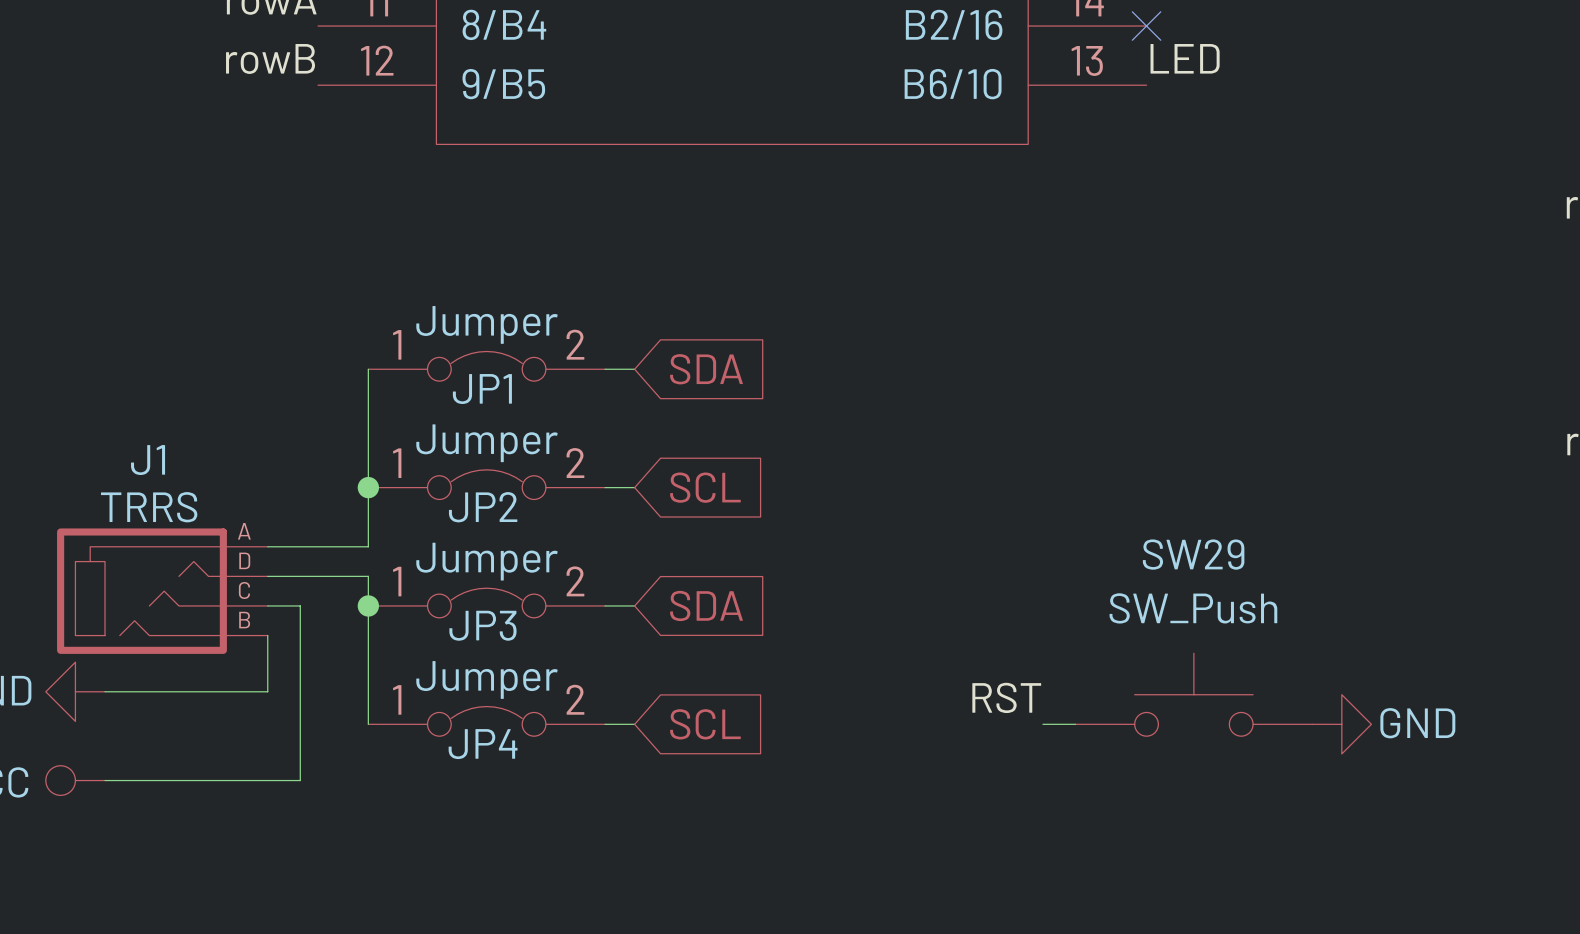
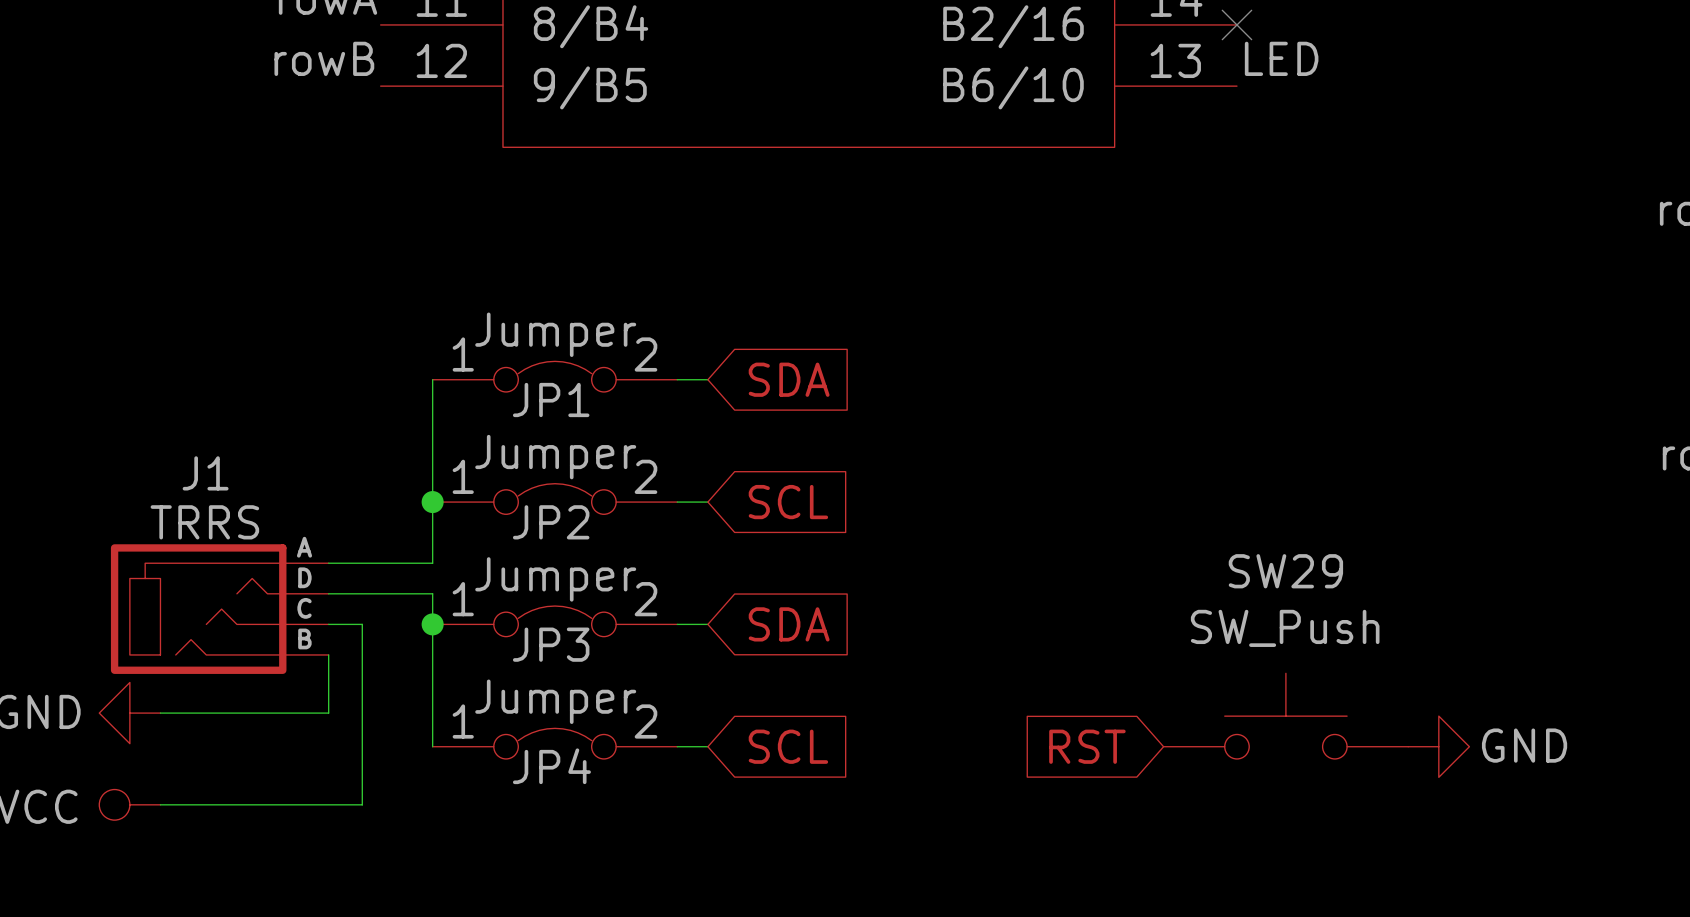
label: RST (1006, 697) -> none
global label: none -> RST (1087, 746)
wire: (1042, 724) (1075, 724) -> none

